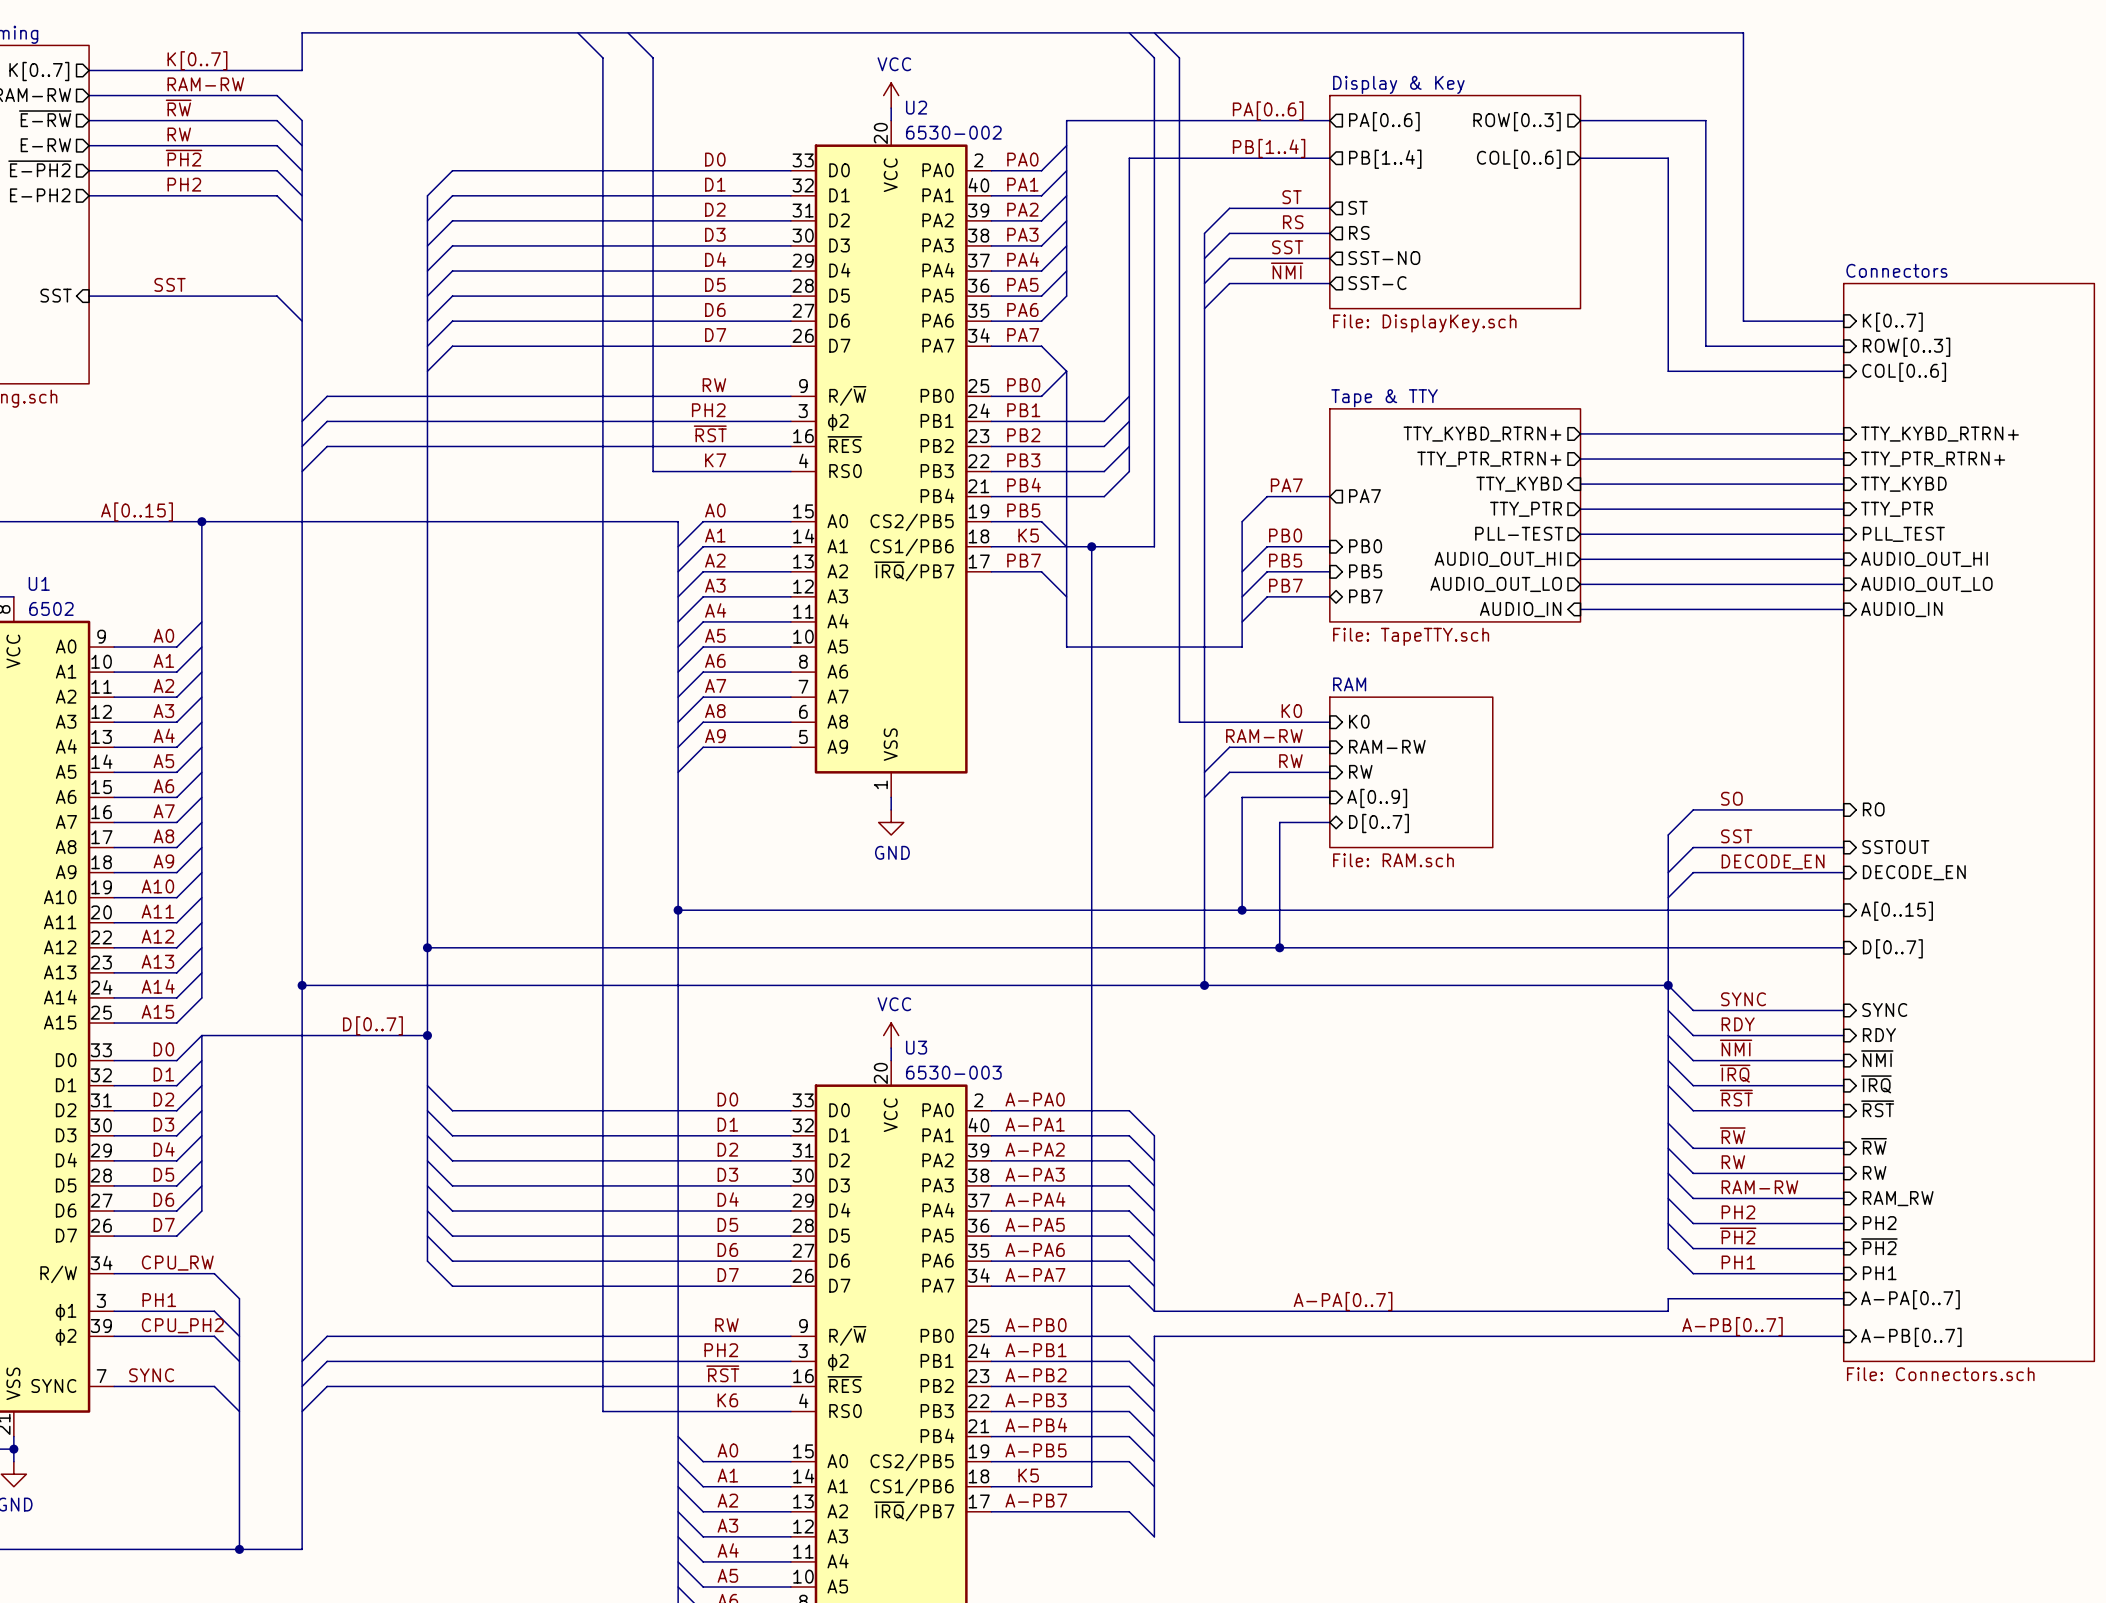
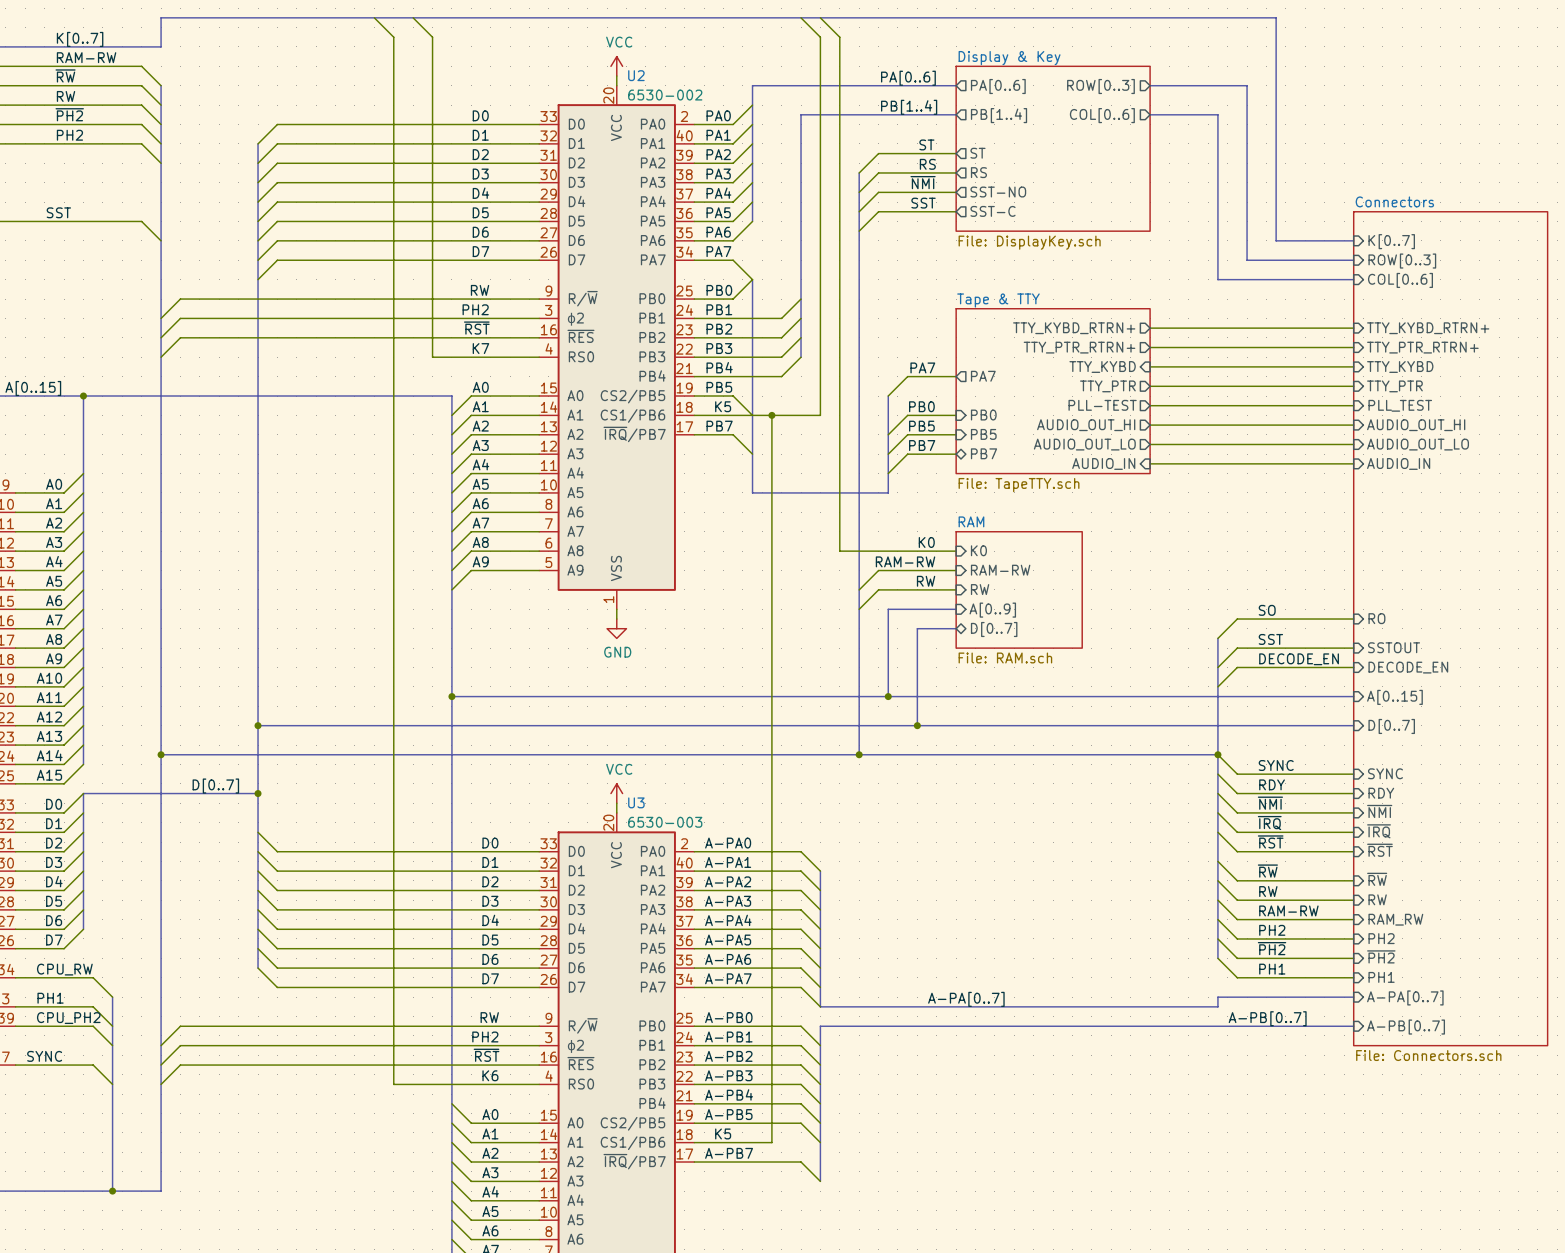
label: SST (1287, 247) -> ~{NMI} (923, 182)
label: ~{NMI} (1287, 270) -> SST (923, 203)

